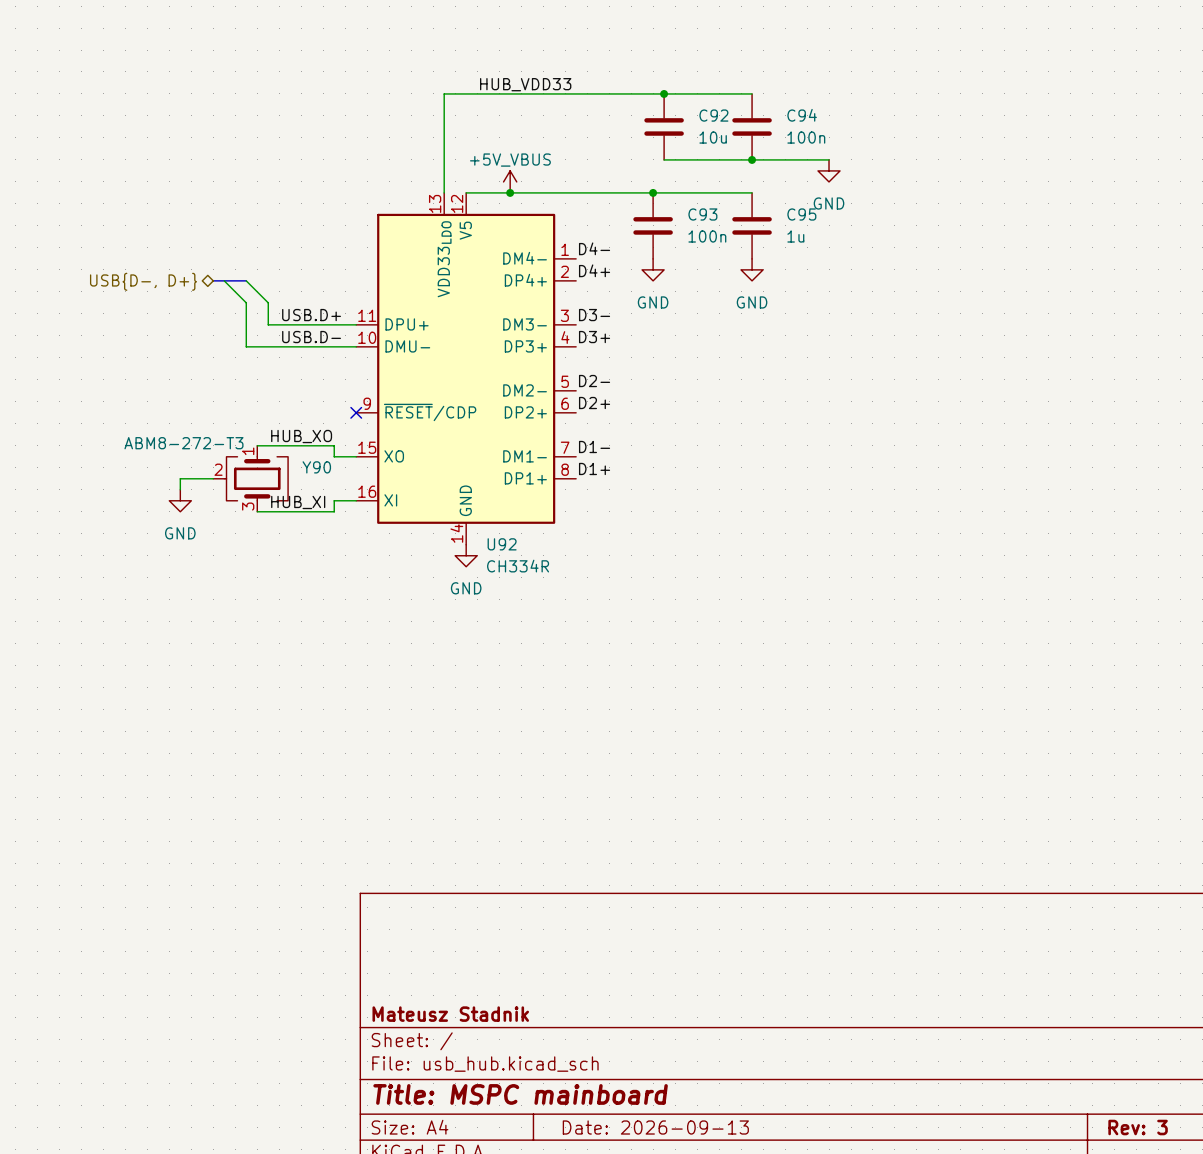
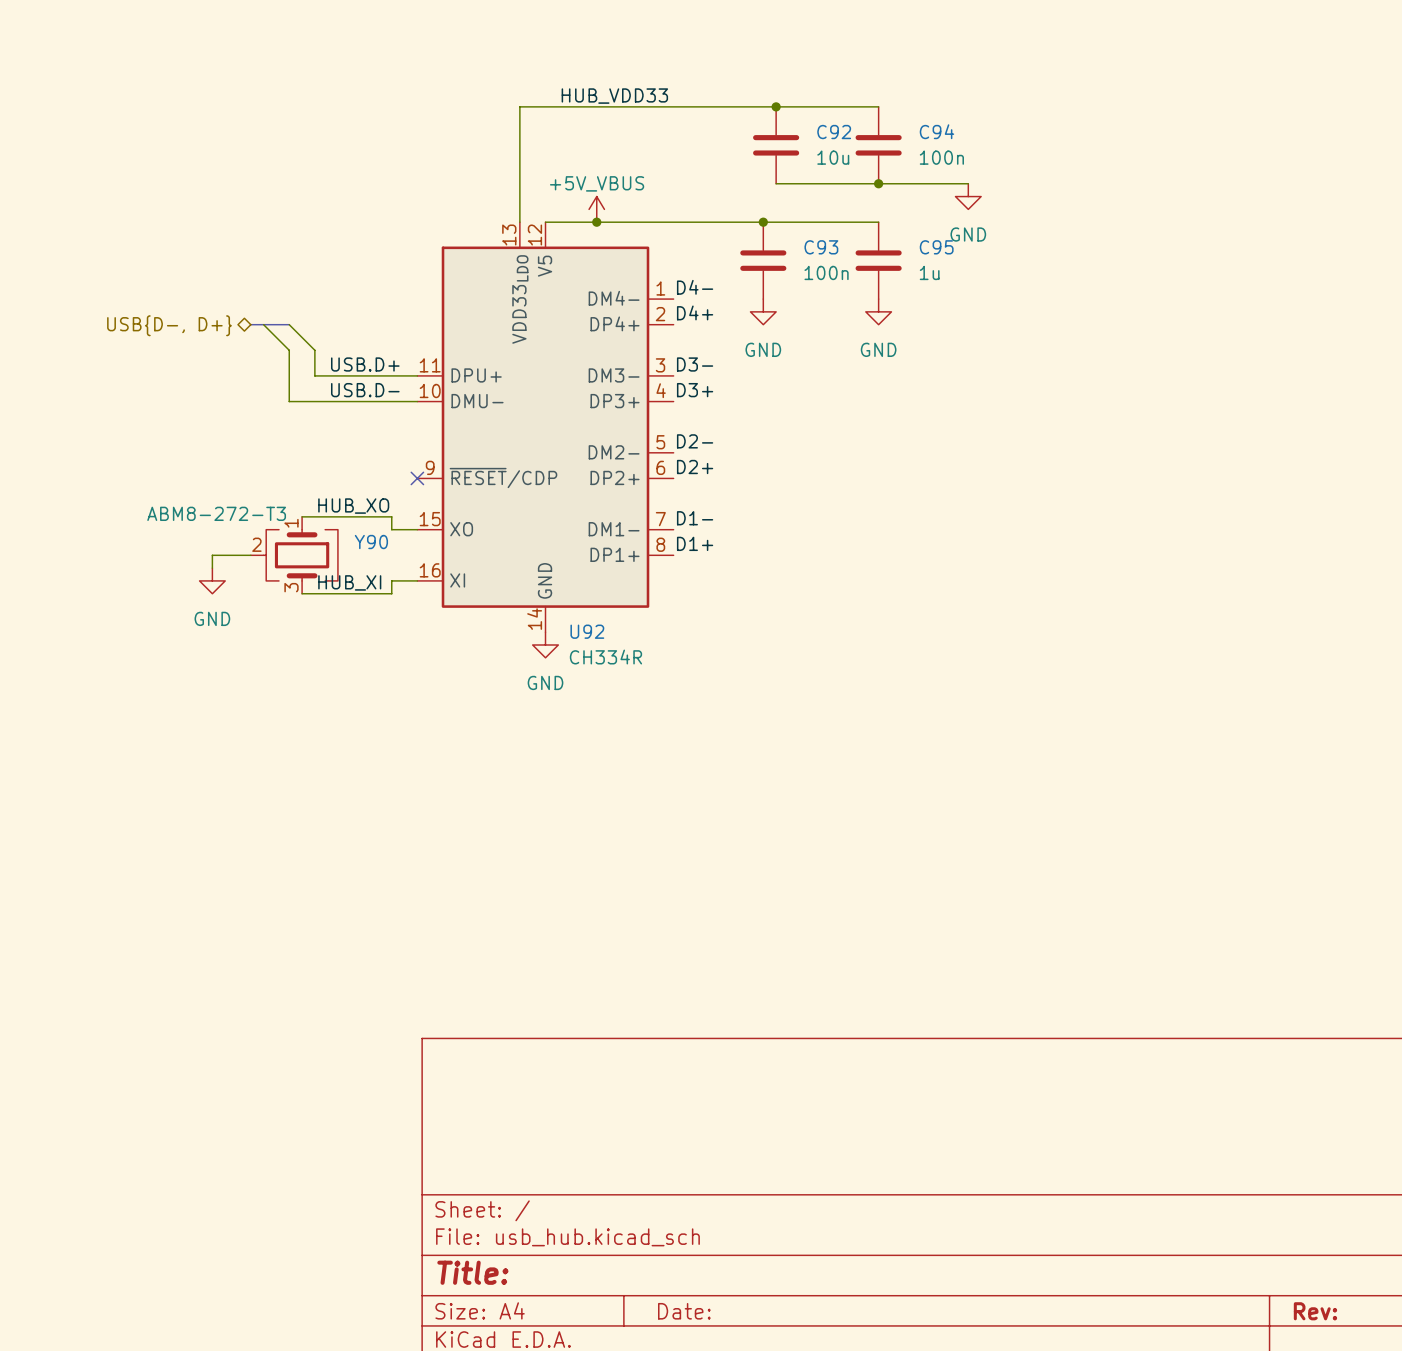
title block: Mateusz Stadnik (450, 1014) -> none
title block: Title: MSPC mainboard (520, 1094) -> Title: (472, 1272)
title block: Date: 2026-09-13 (655, 1127) -> Date: (684, 1311)
title block: Rev: 3 (1138, 1127) -> Rev: (1315, 1311)

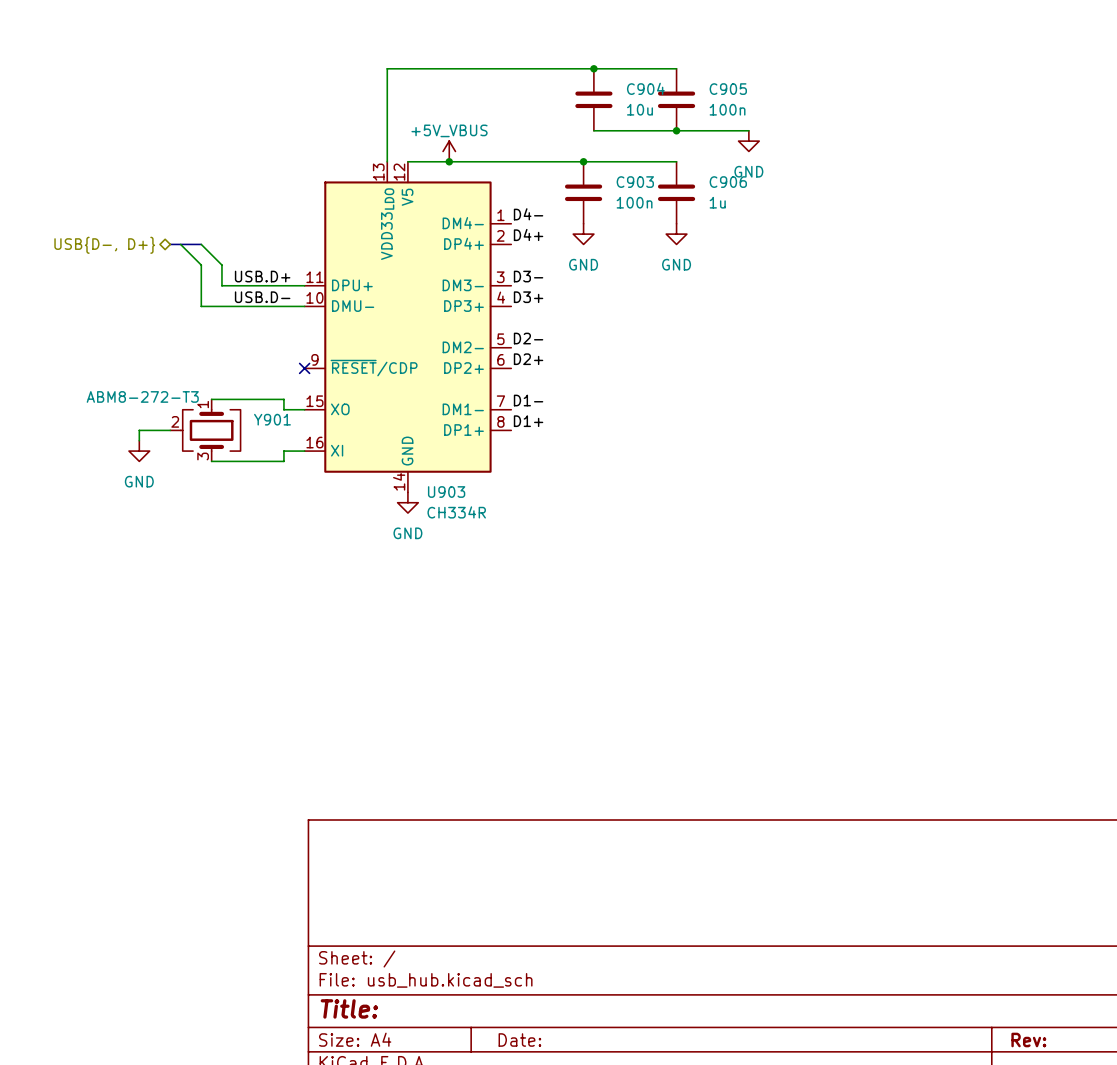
label: HUB_VDD33 (614, 96) -> none
C94 name: C94 (936, 131) -> C905 (728, 89)
C92 name: C92 (834, 132) -> C904 (645, 88)
C93 name: C93 (821, 247) -> C903 (635, 182)
C95 name: C95 (936, 247) -> C906 (728, 182)
label: HUB_XO (353, 506) -> none
Y90 name: Y90 (371, 542) -> Y901 (272, 419)
label: HUB_XI (349, 582) -> none
U92 name: U92 (587, 631) -> U903 (446, 492)

